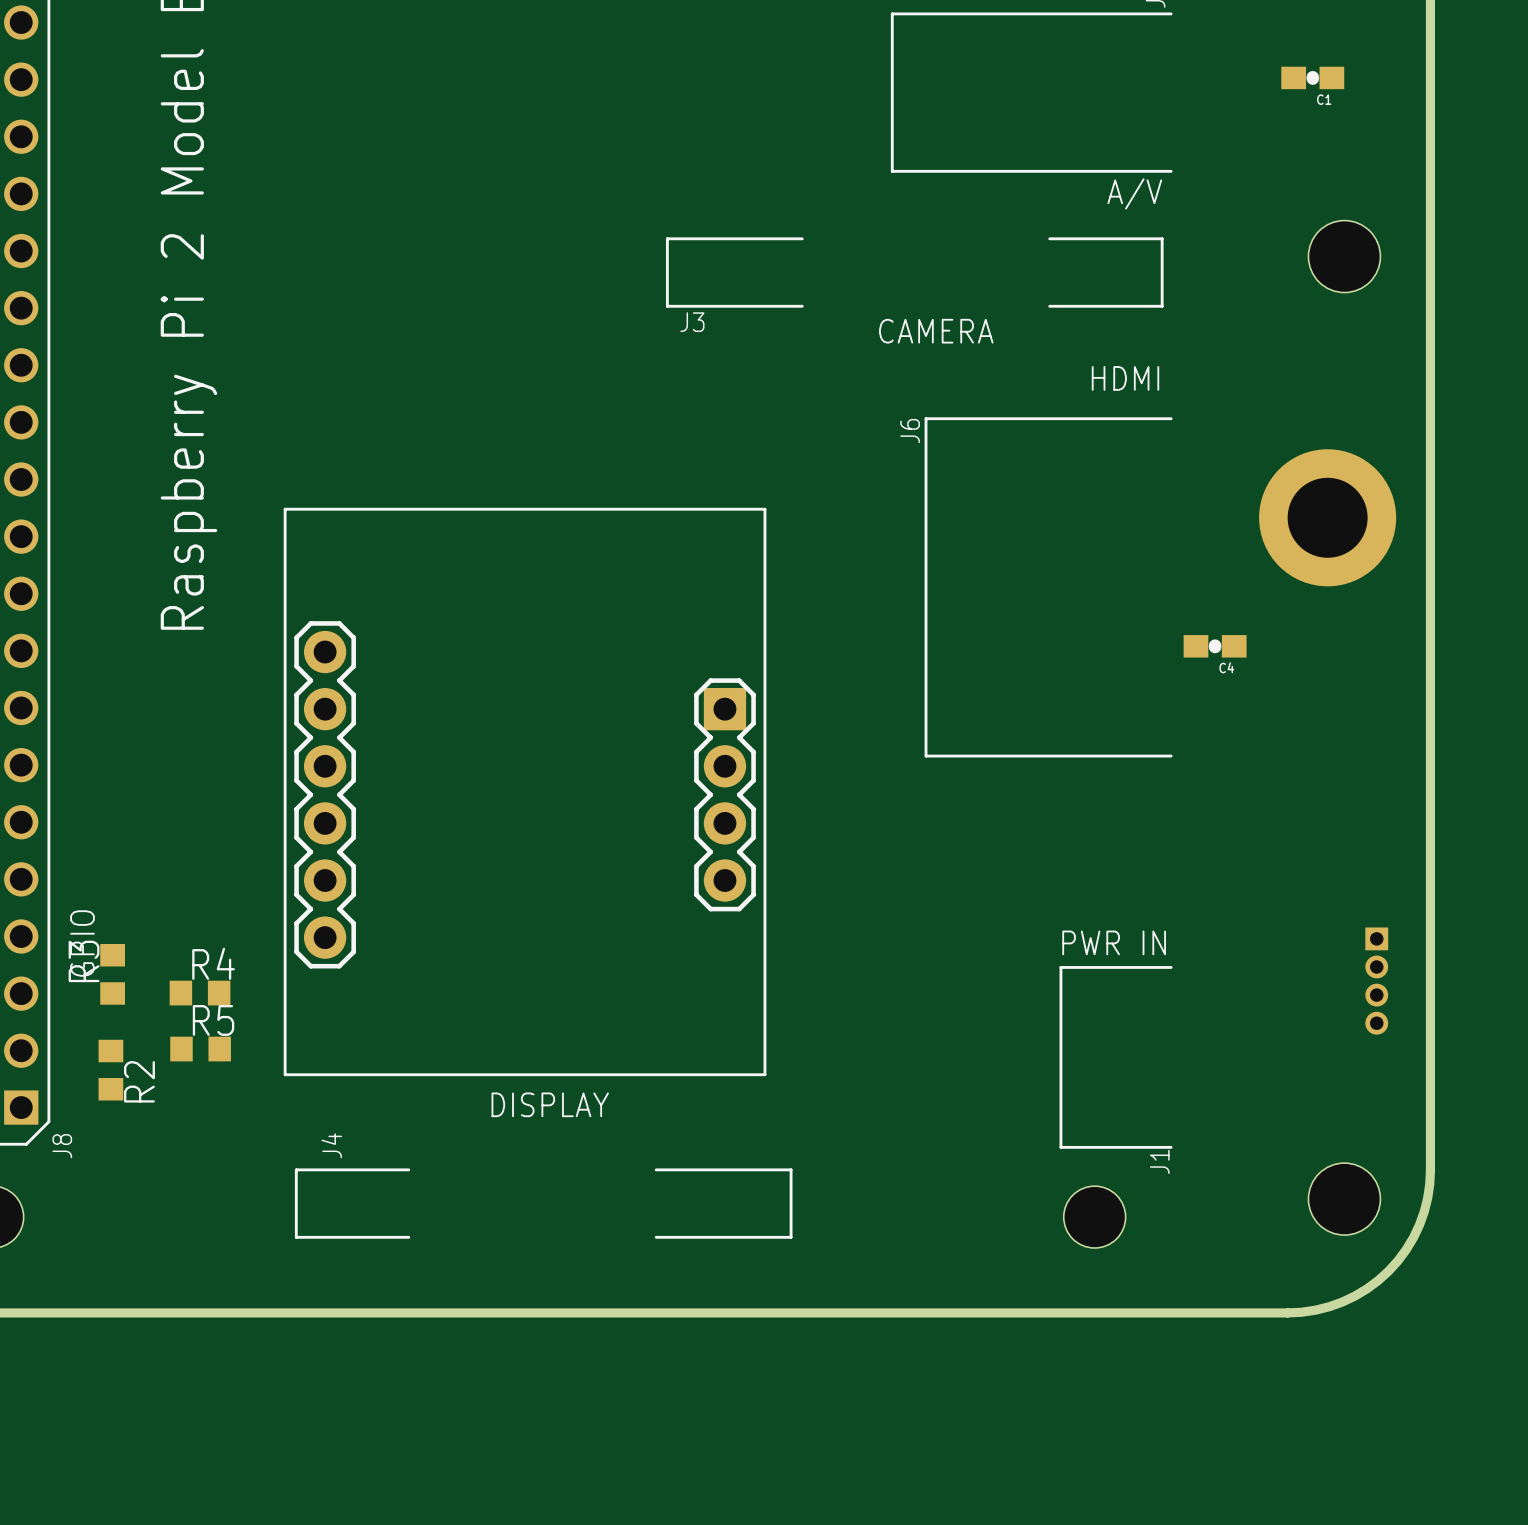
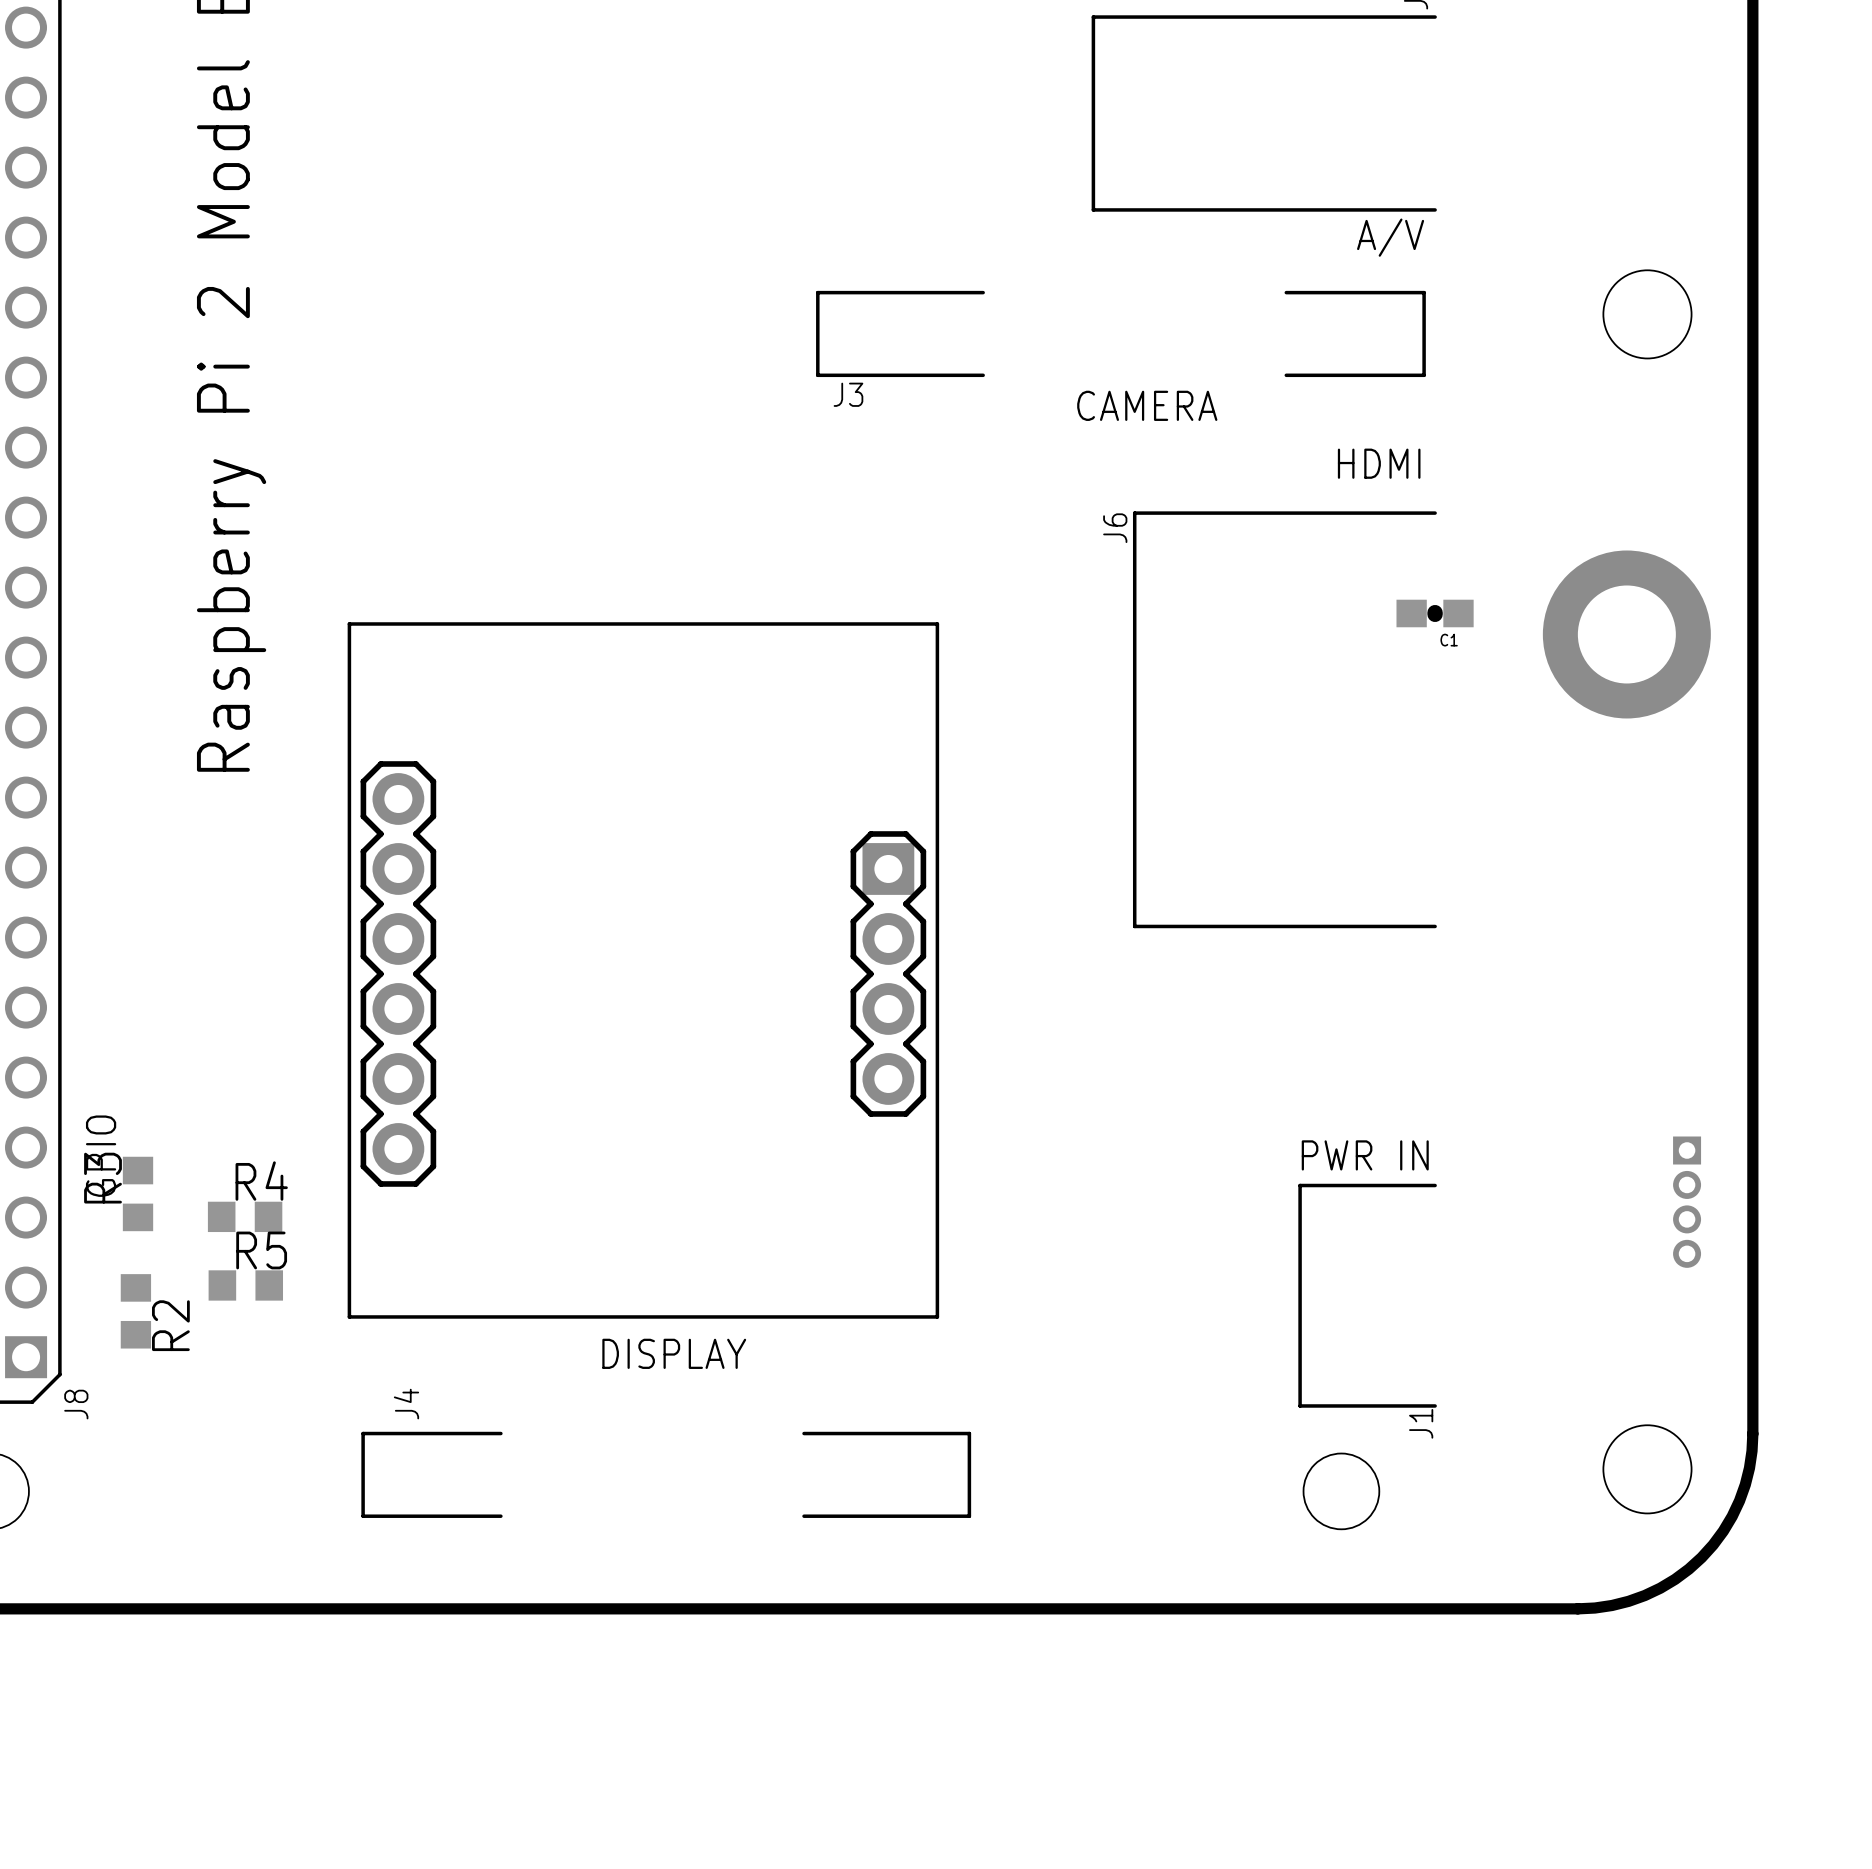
C1 position: (1312, 77) -> (1435, 613)
C4: (1215, 646) -> none

